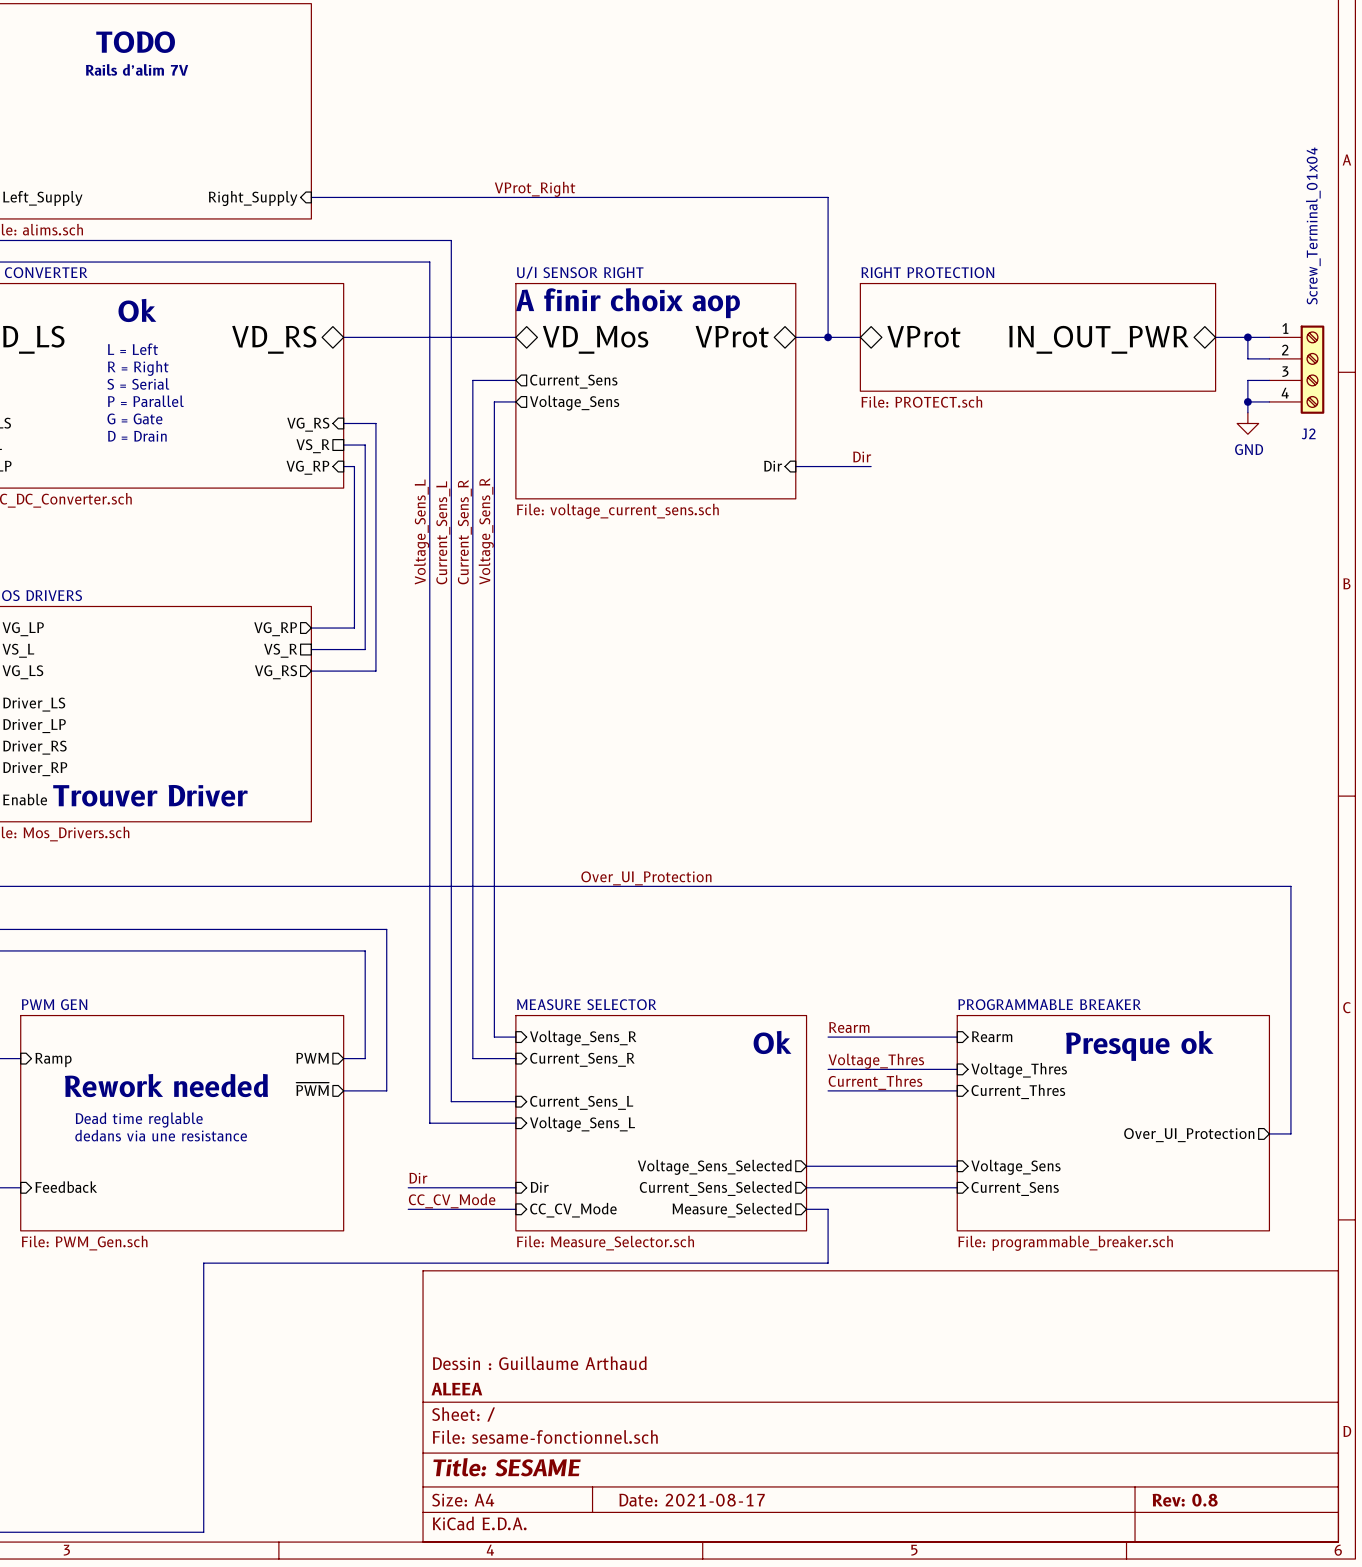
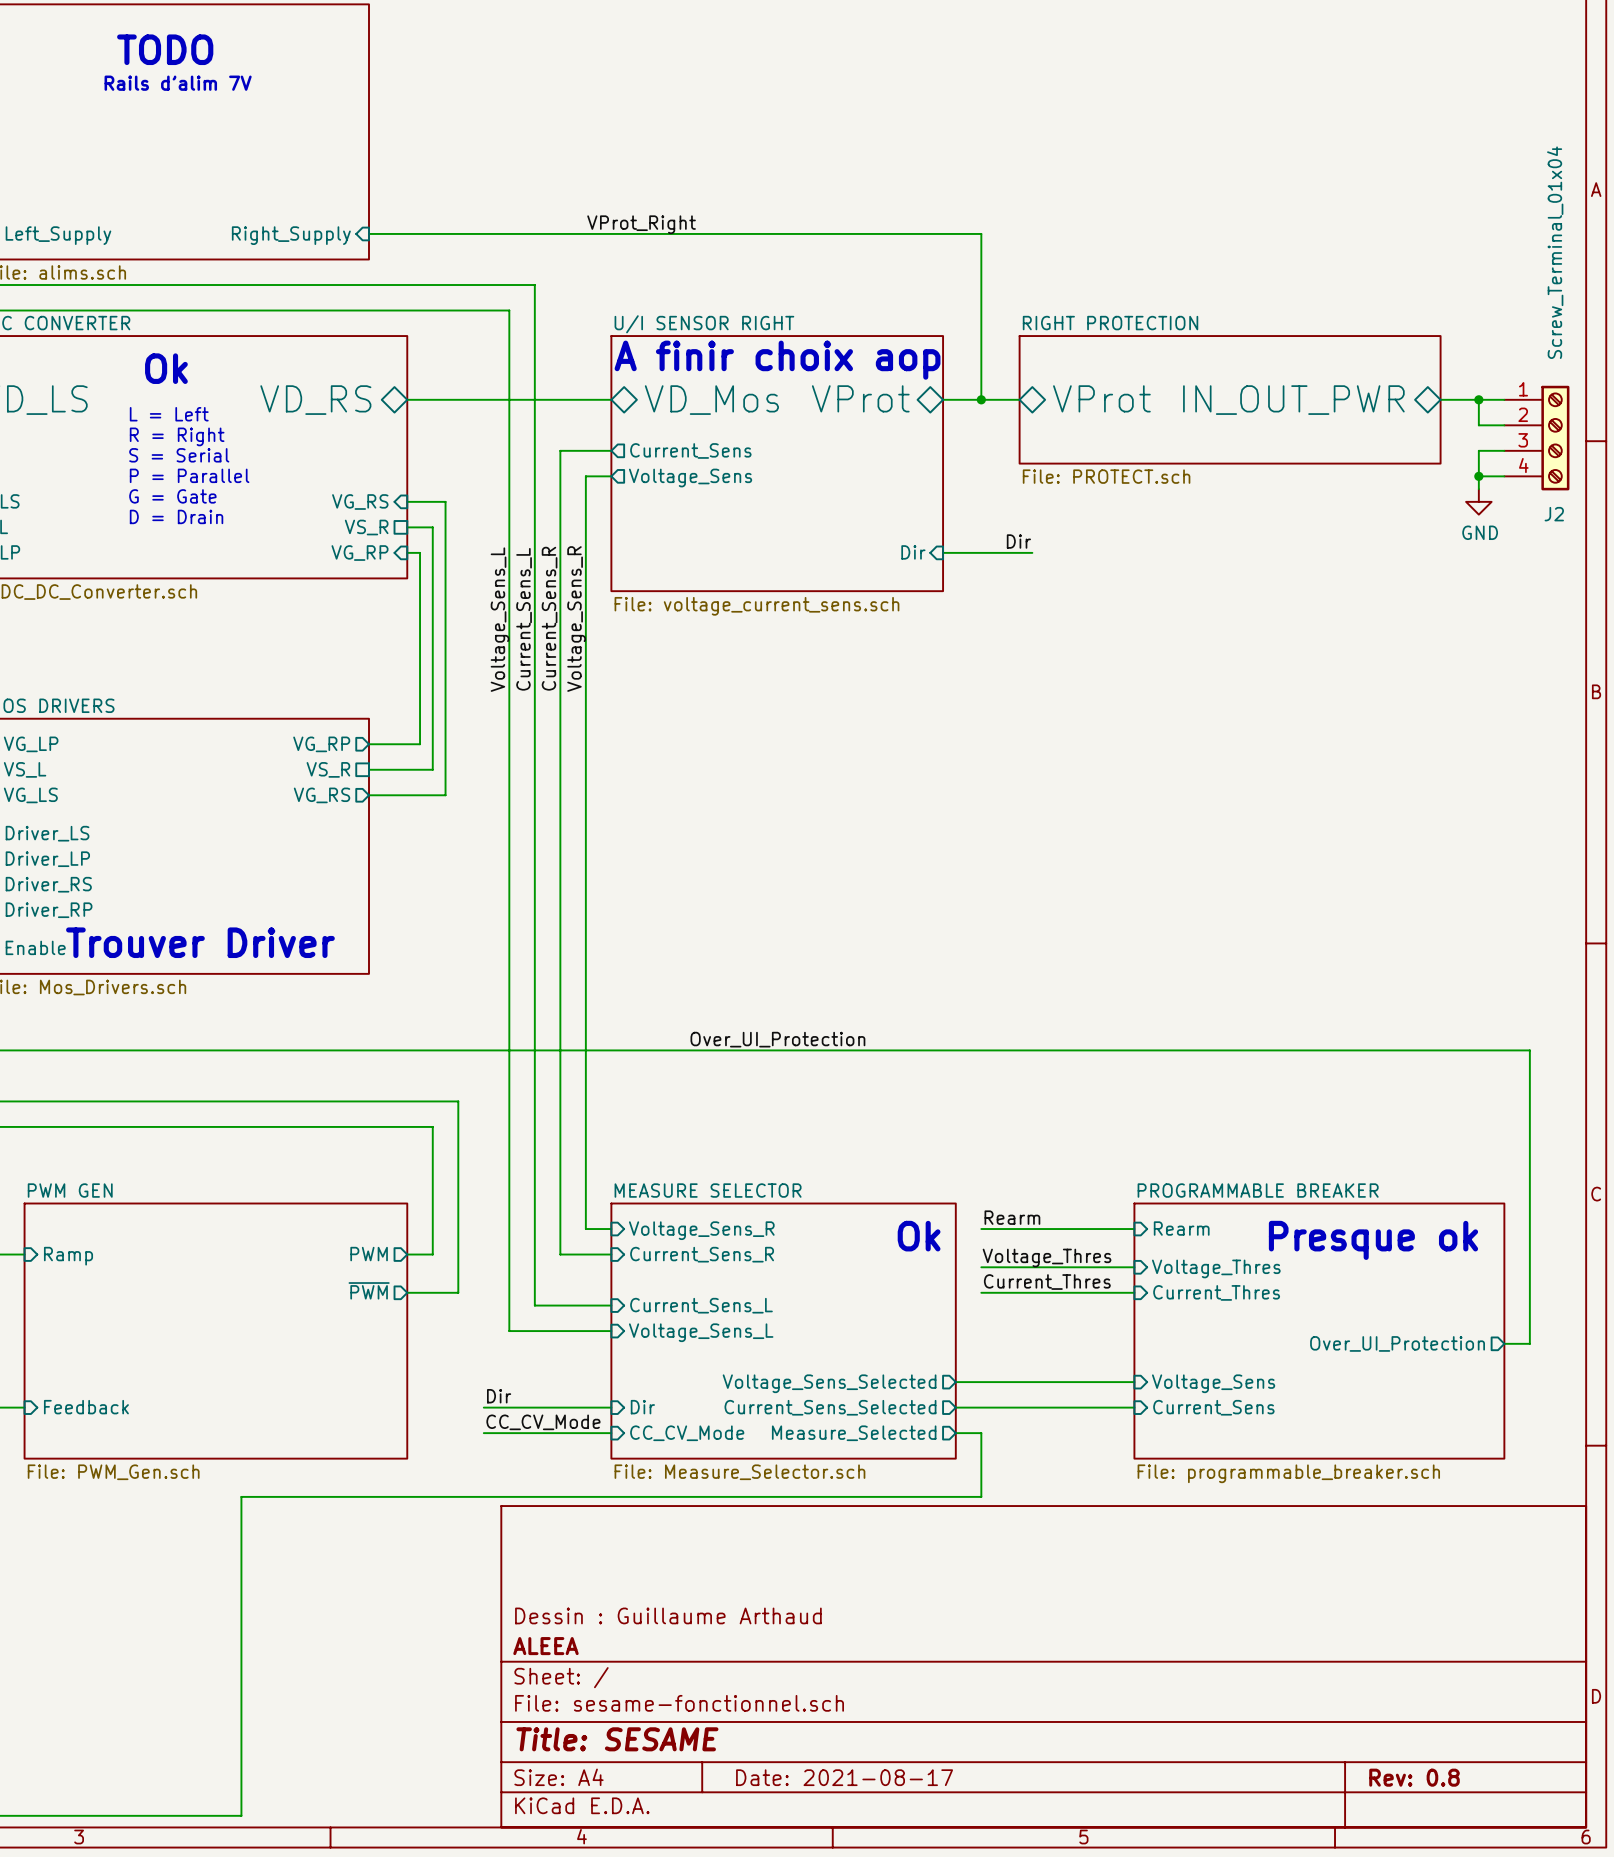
text: Rework needed (166, 1085) -> none
text: Dead time reglable (139, 1120) -> none
text: dedans via une resistance (161, 1135) -> none

